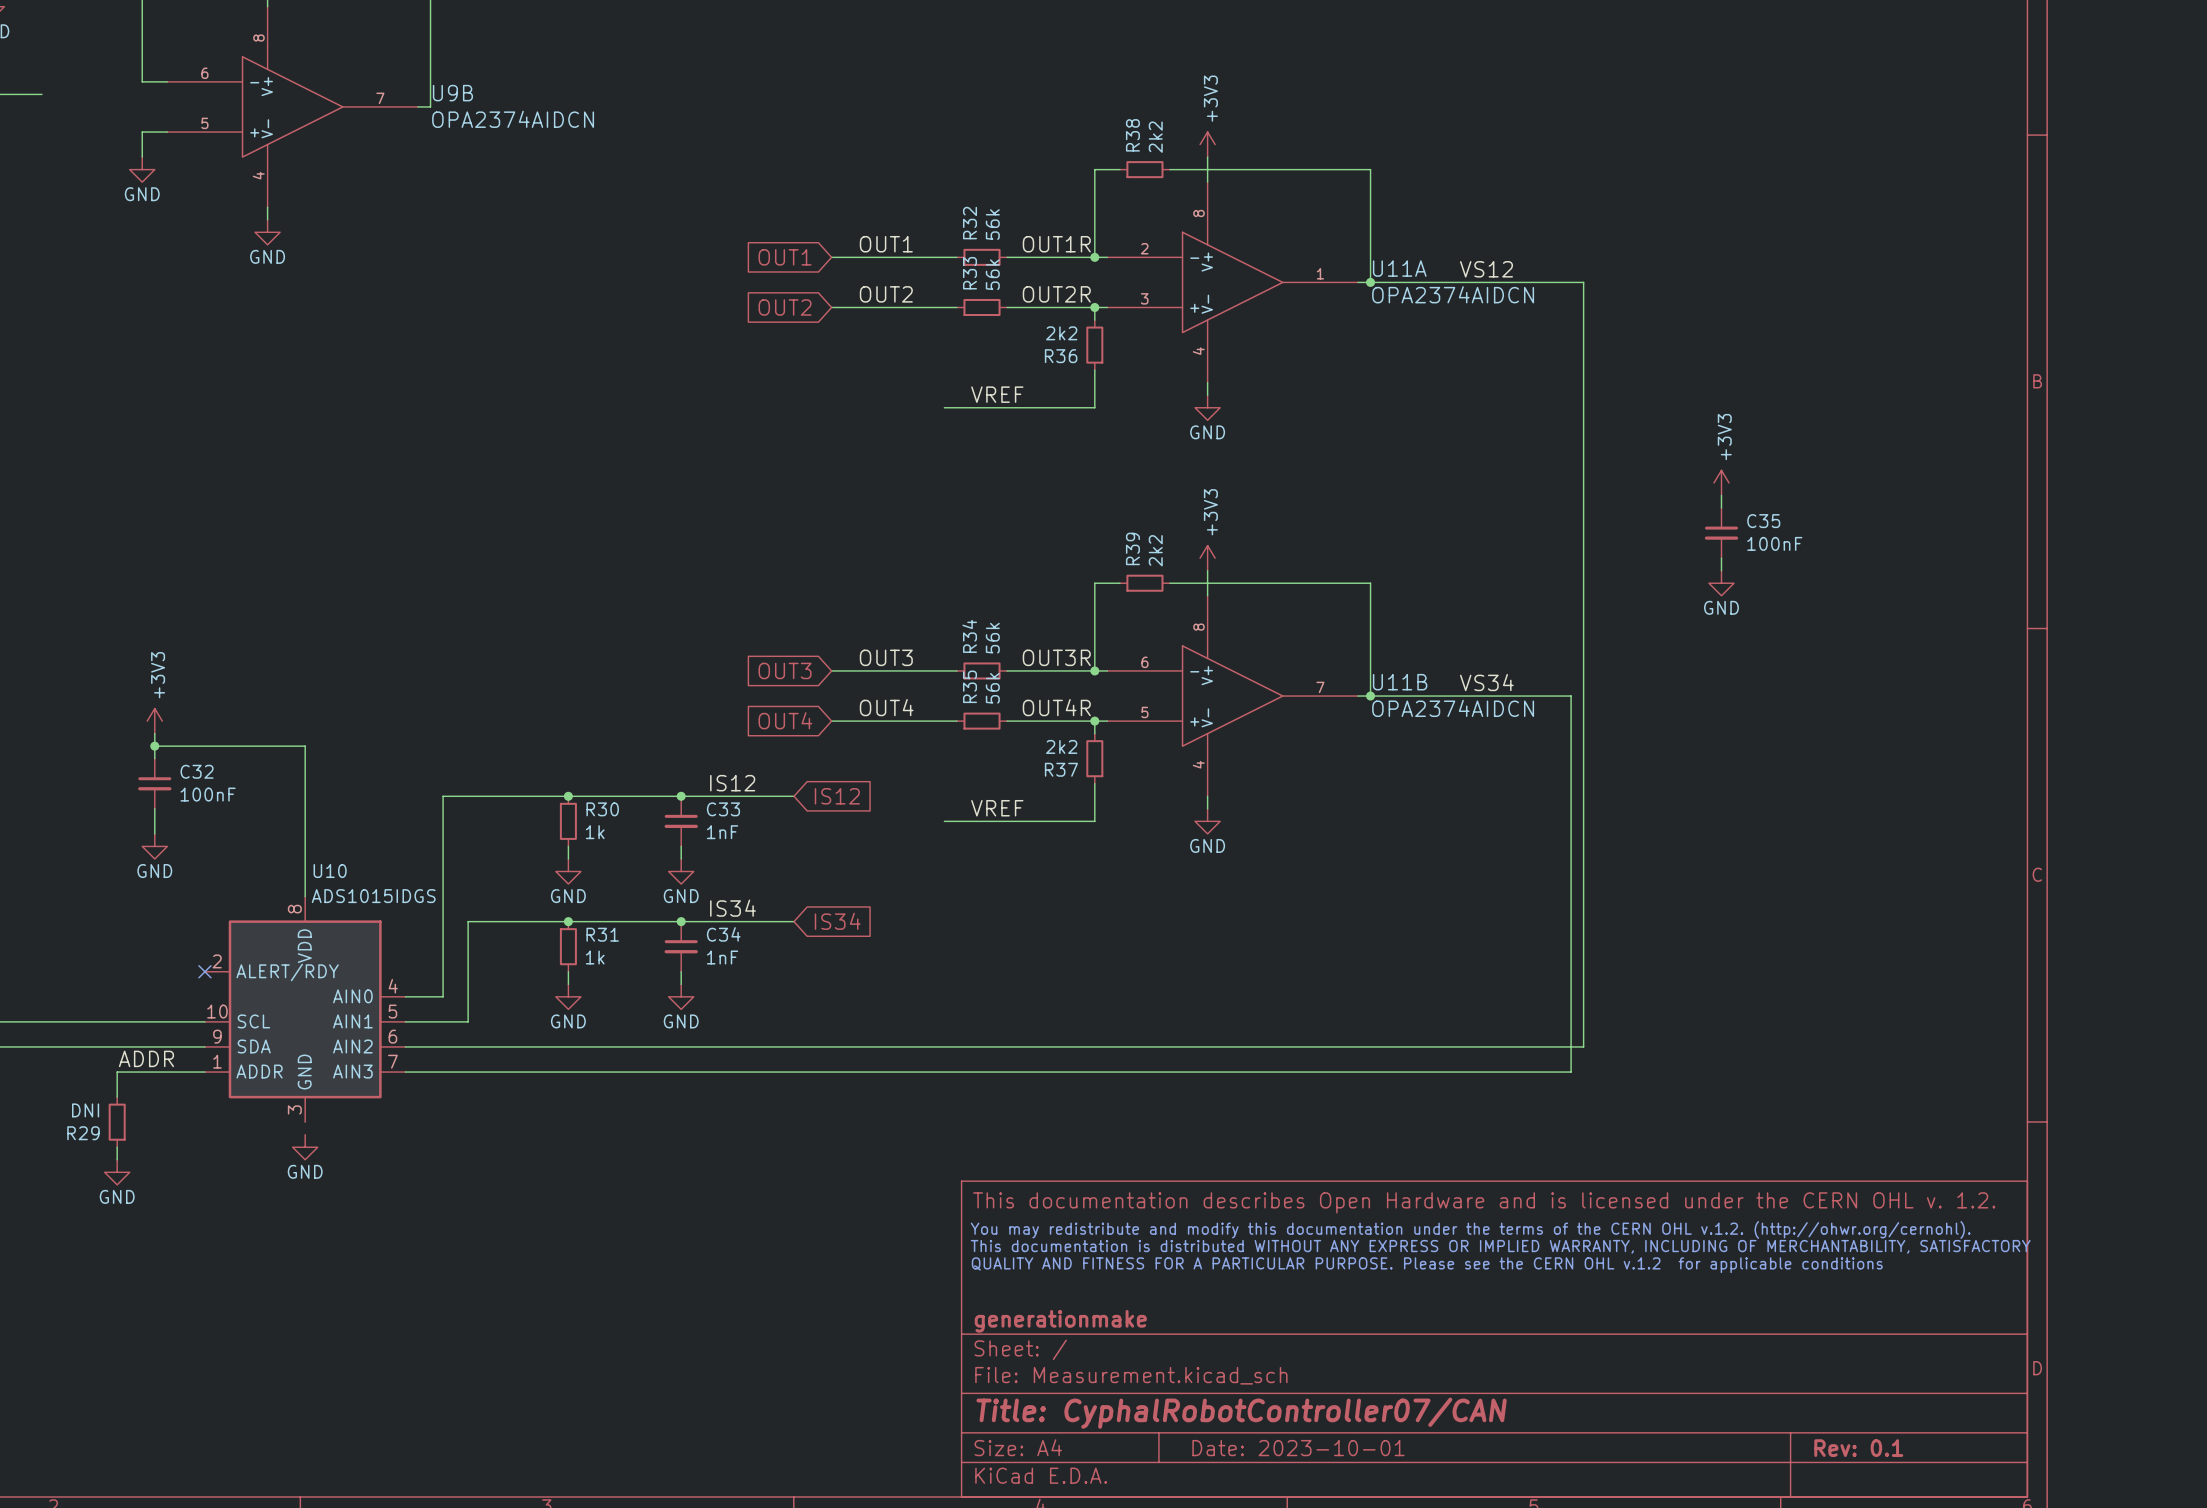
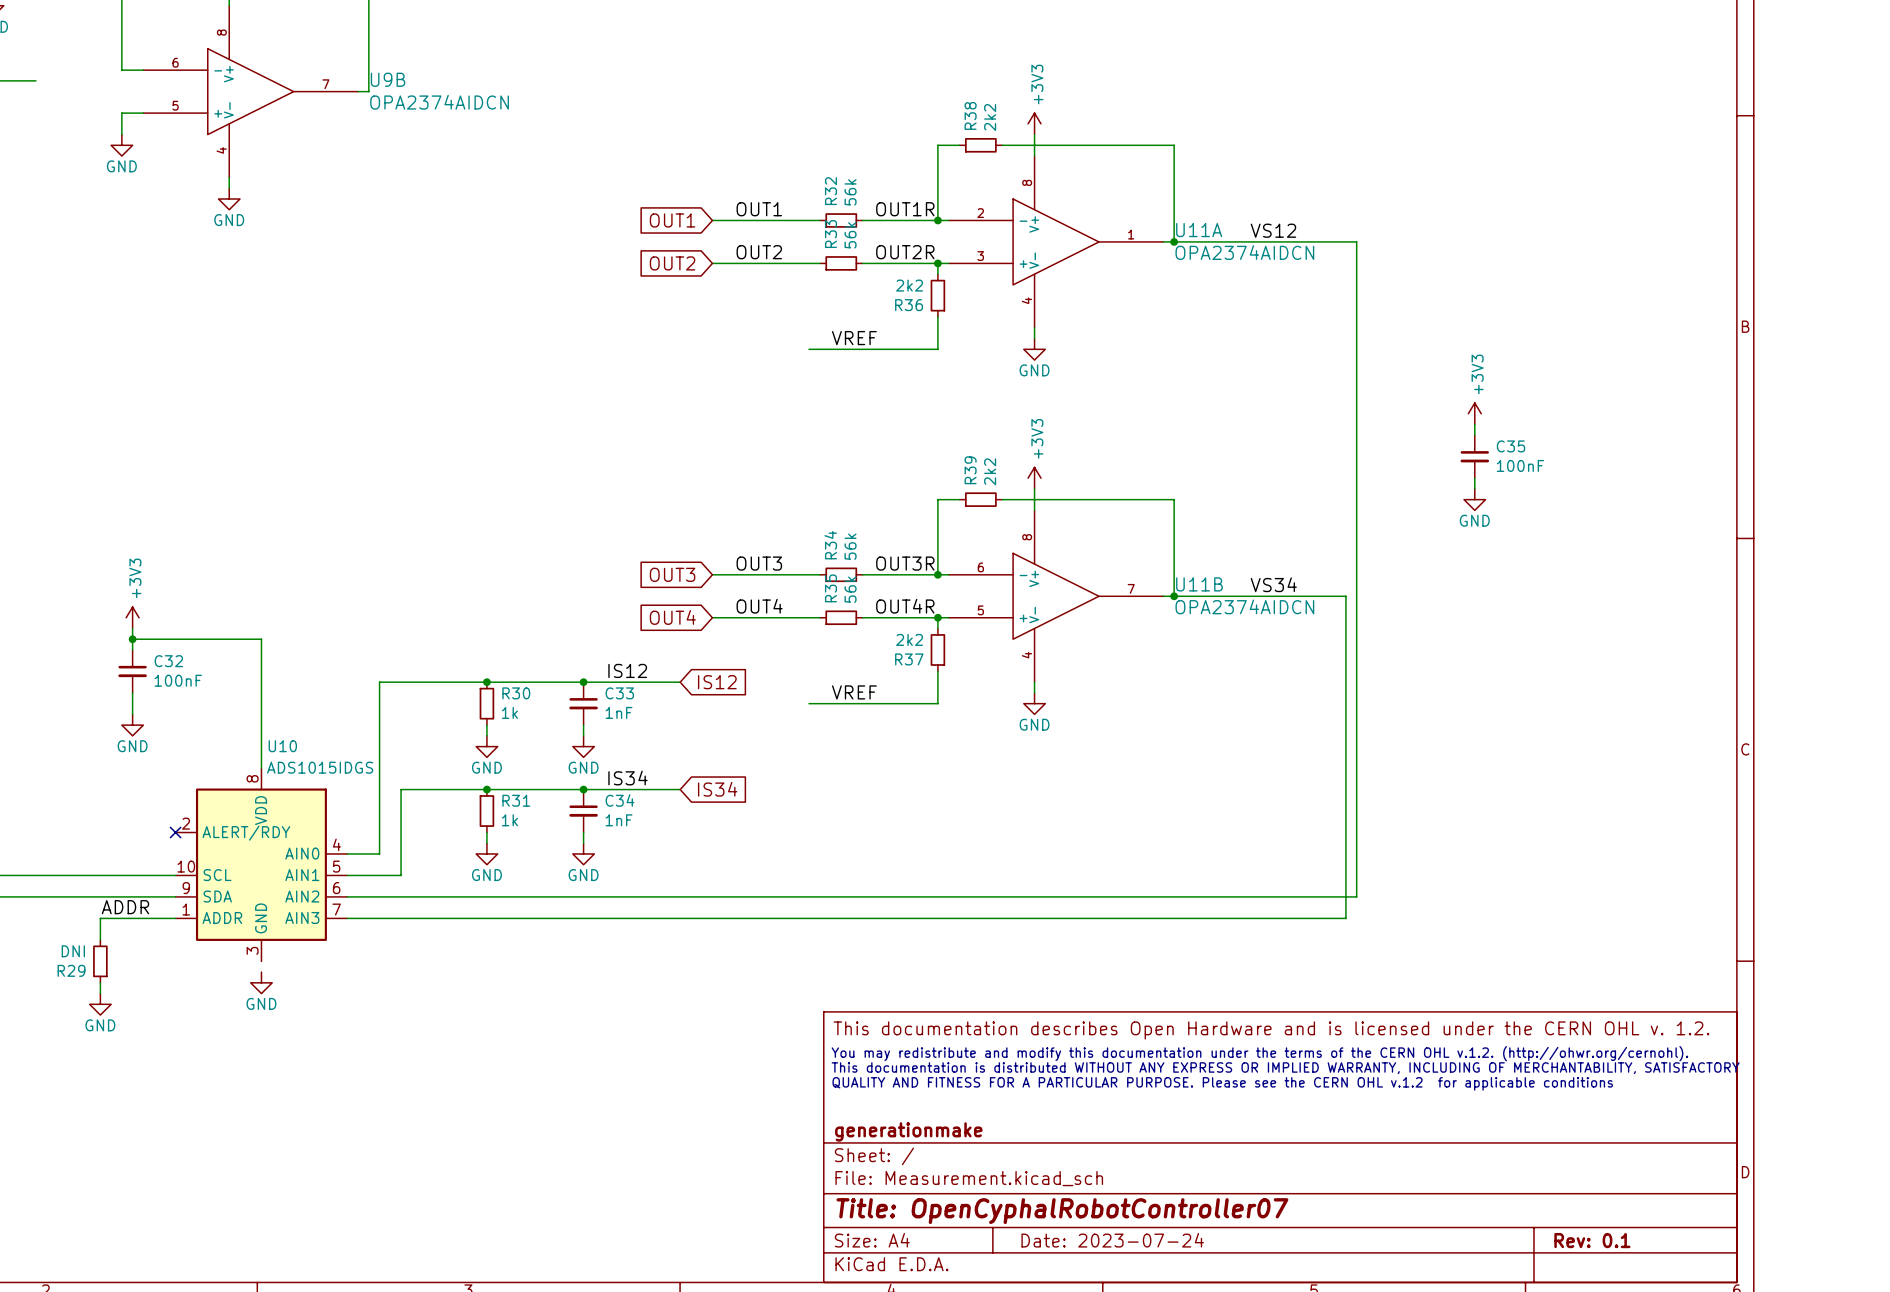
title block: Title: CyphalRobotController07/CAN (1241, 1413) -> Title: OpenCyphalRobotController07 (1062, 1211)
title block: Date: 2023-10-01 (1298, 1448) -> Date: 2023-07-24 (1112, 1240)

